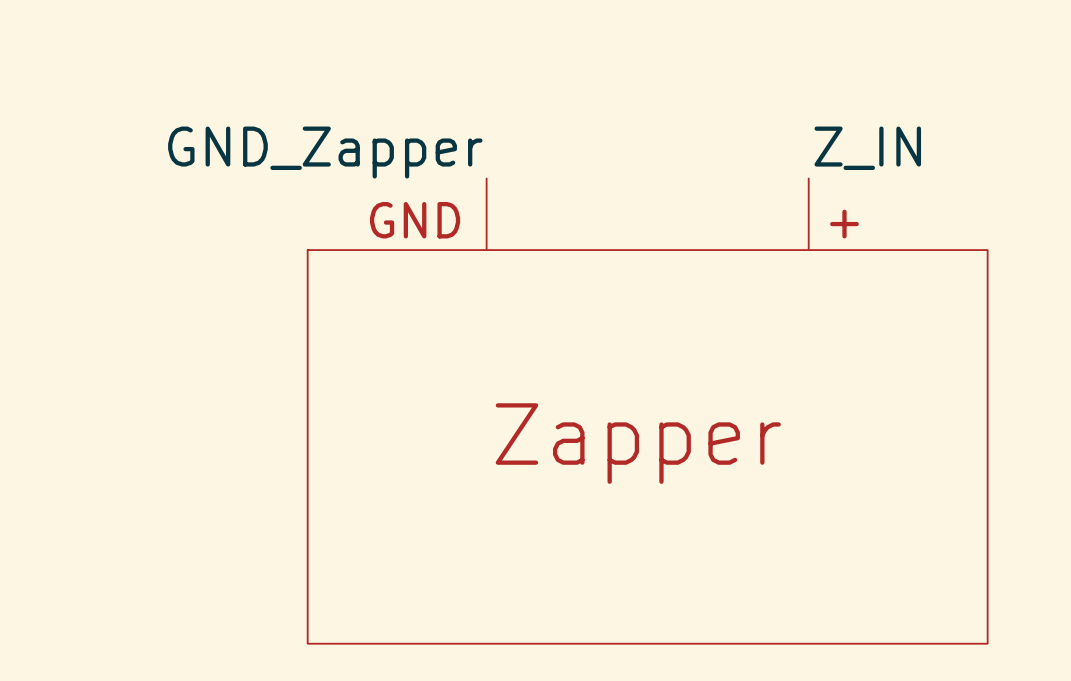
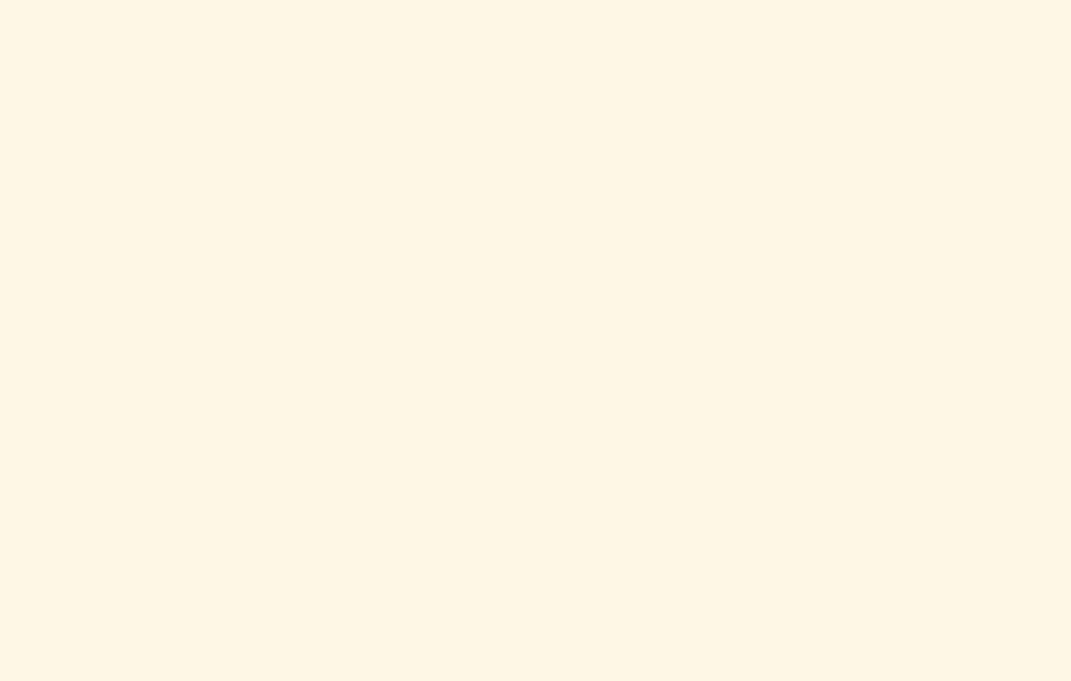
label: Z_IN (867, 148) -> none
label: GND_Zapper (325, 152) -> none
part: (647, 411) -> none

